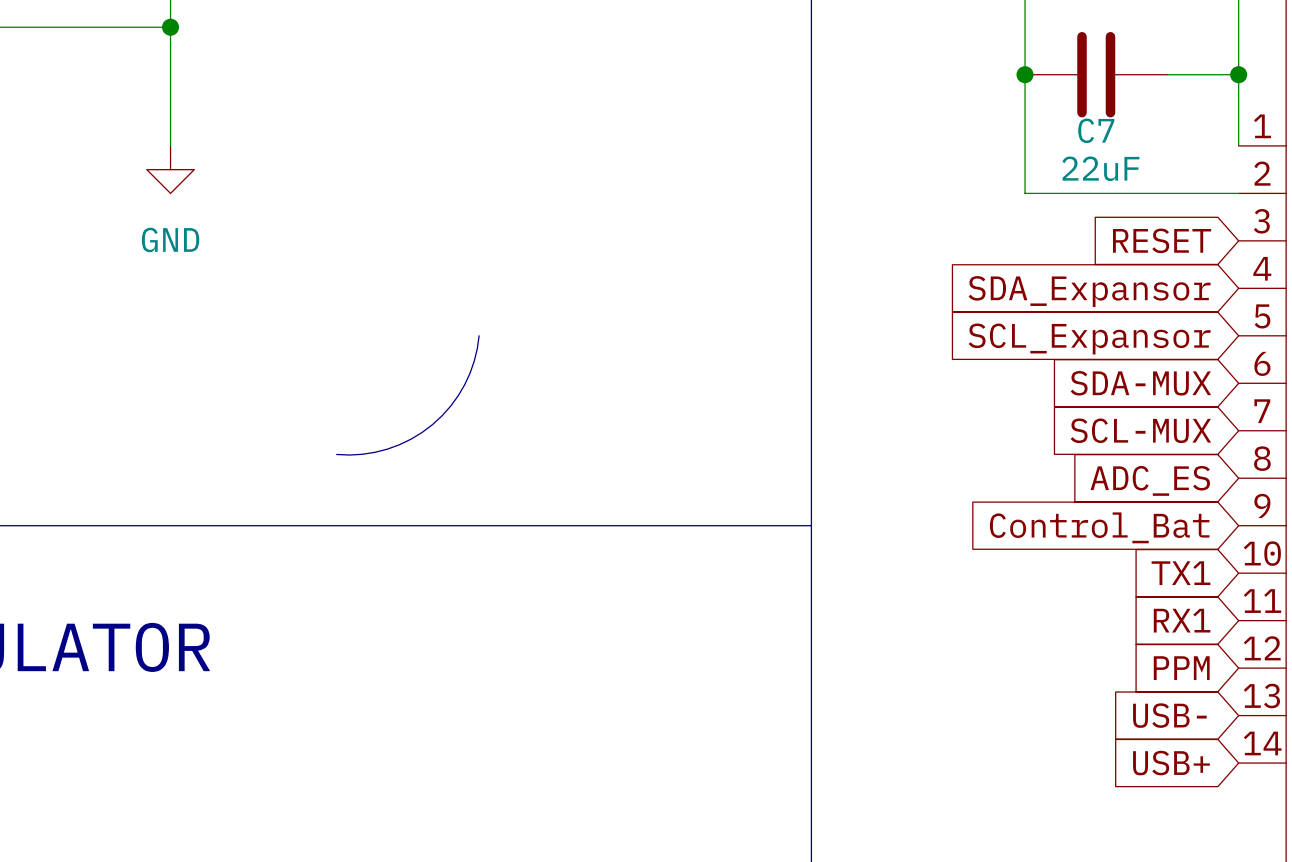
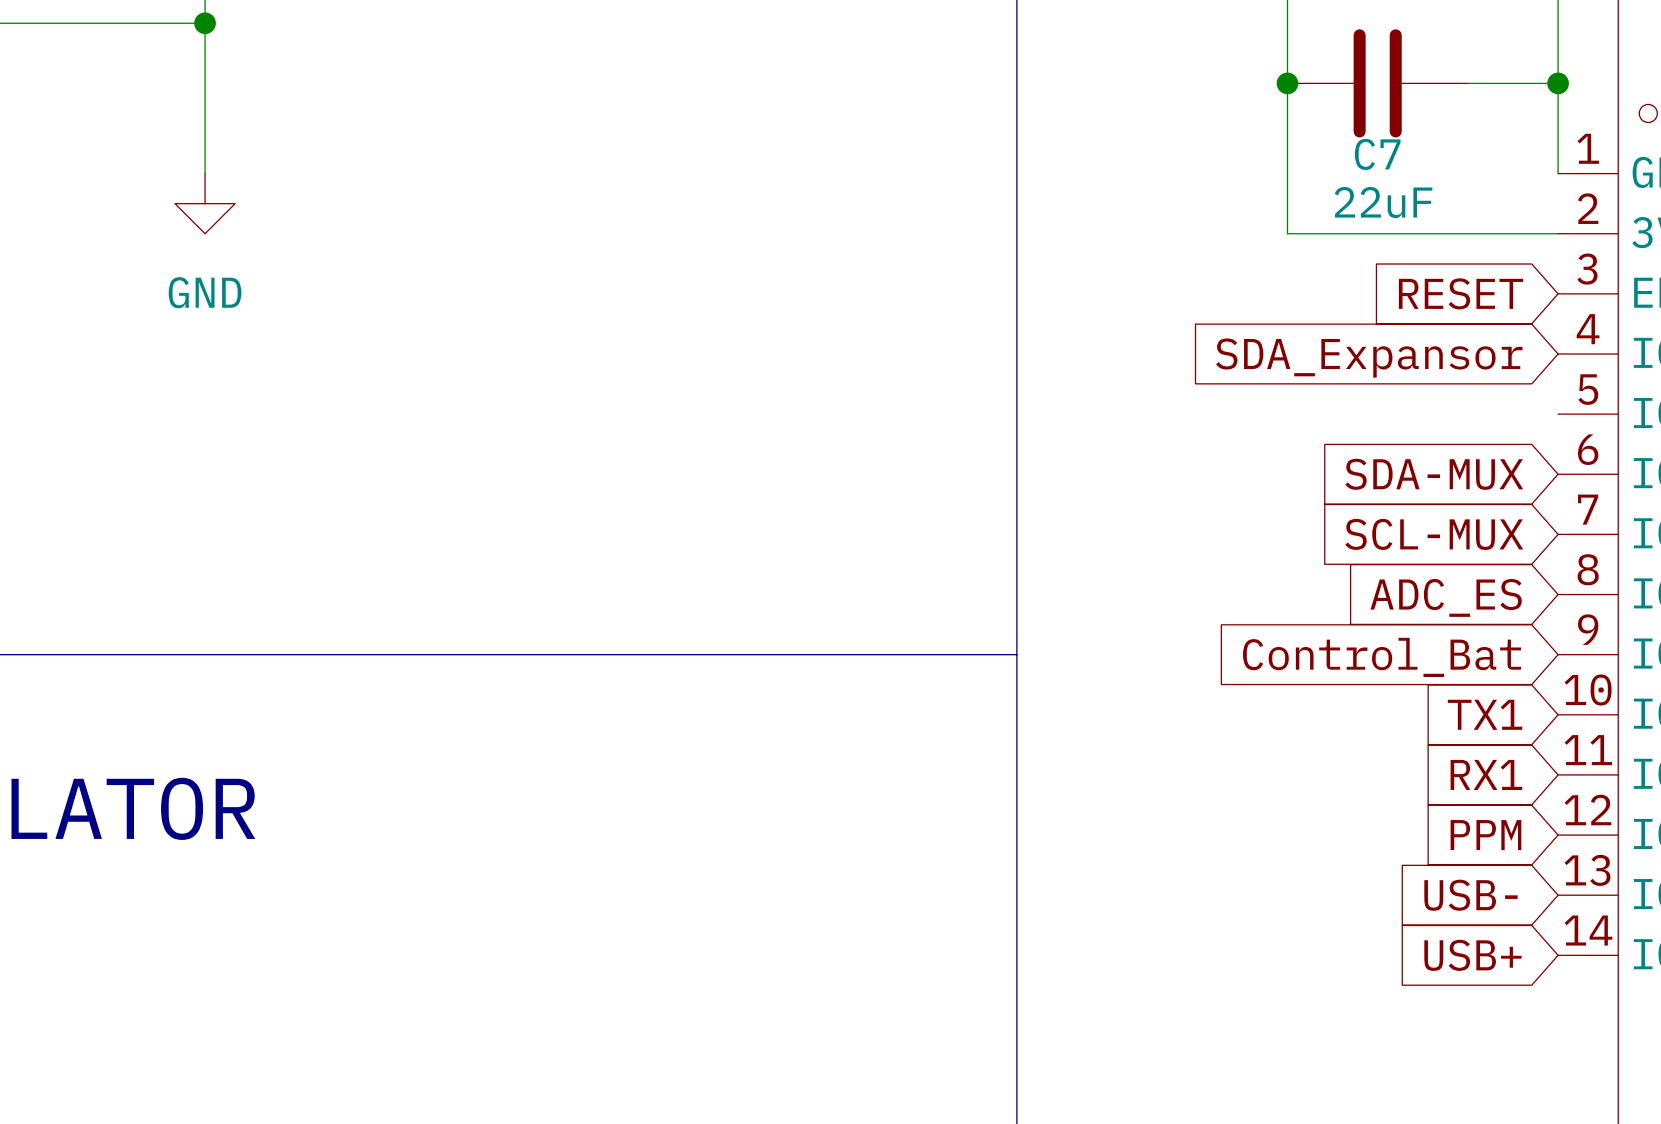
line: (479, 335) (474, 361) (464, 384) (450, 406) (432, 424) (411, 439) (387, 449) (362, 454) (336, 454) -> none
global label: SCL_Expansor (1089, 339) -> none

